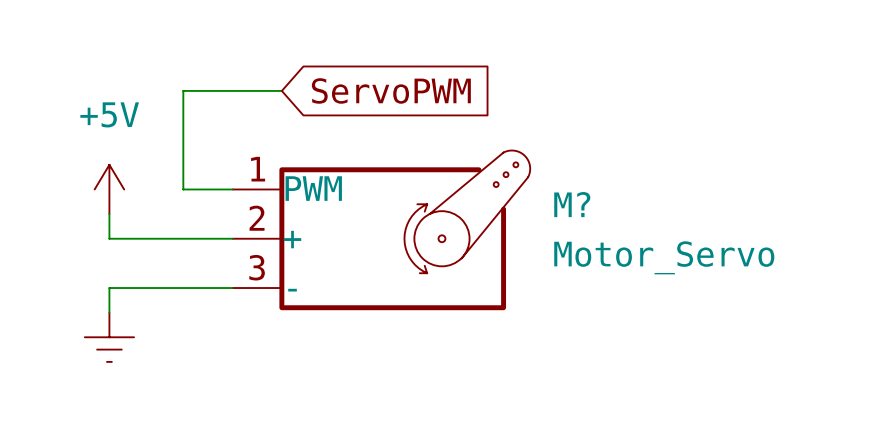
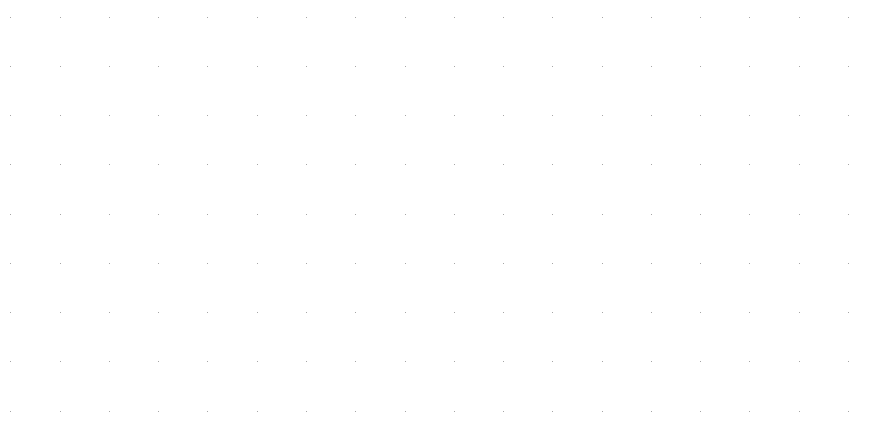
wire: (281, 90) (183, 90) (183, 189) (232, 189) -> none
global label: ServoPWM (391, 90) -> none
power symbol: +5V (109, 189) -> none
wire: (109, 214) (109, 238) (232, 238) -> none
M?: Motor_Servo (381, 230) -> none
wire: (232, 288) (109, 288) (109, 312) -> none
power symbol: (109, 337) -> none

